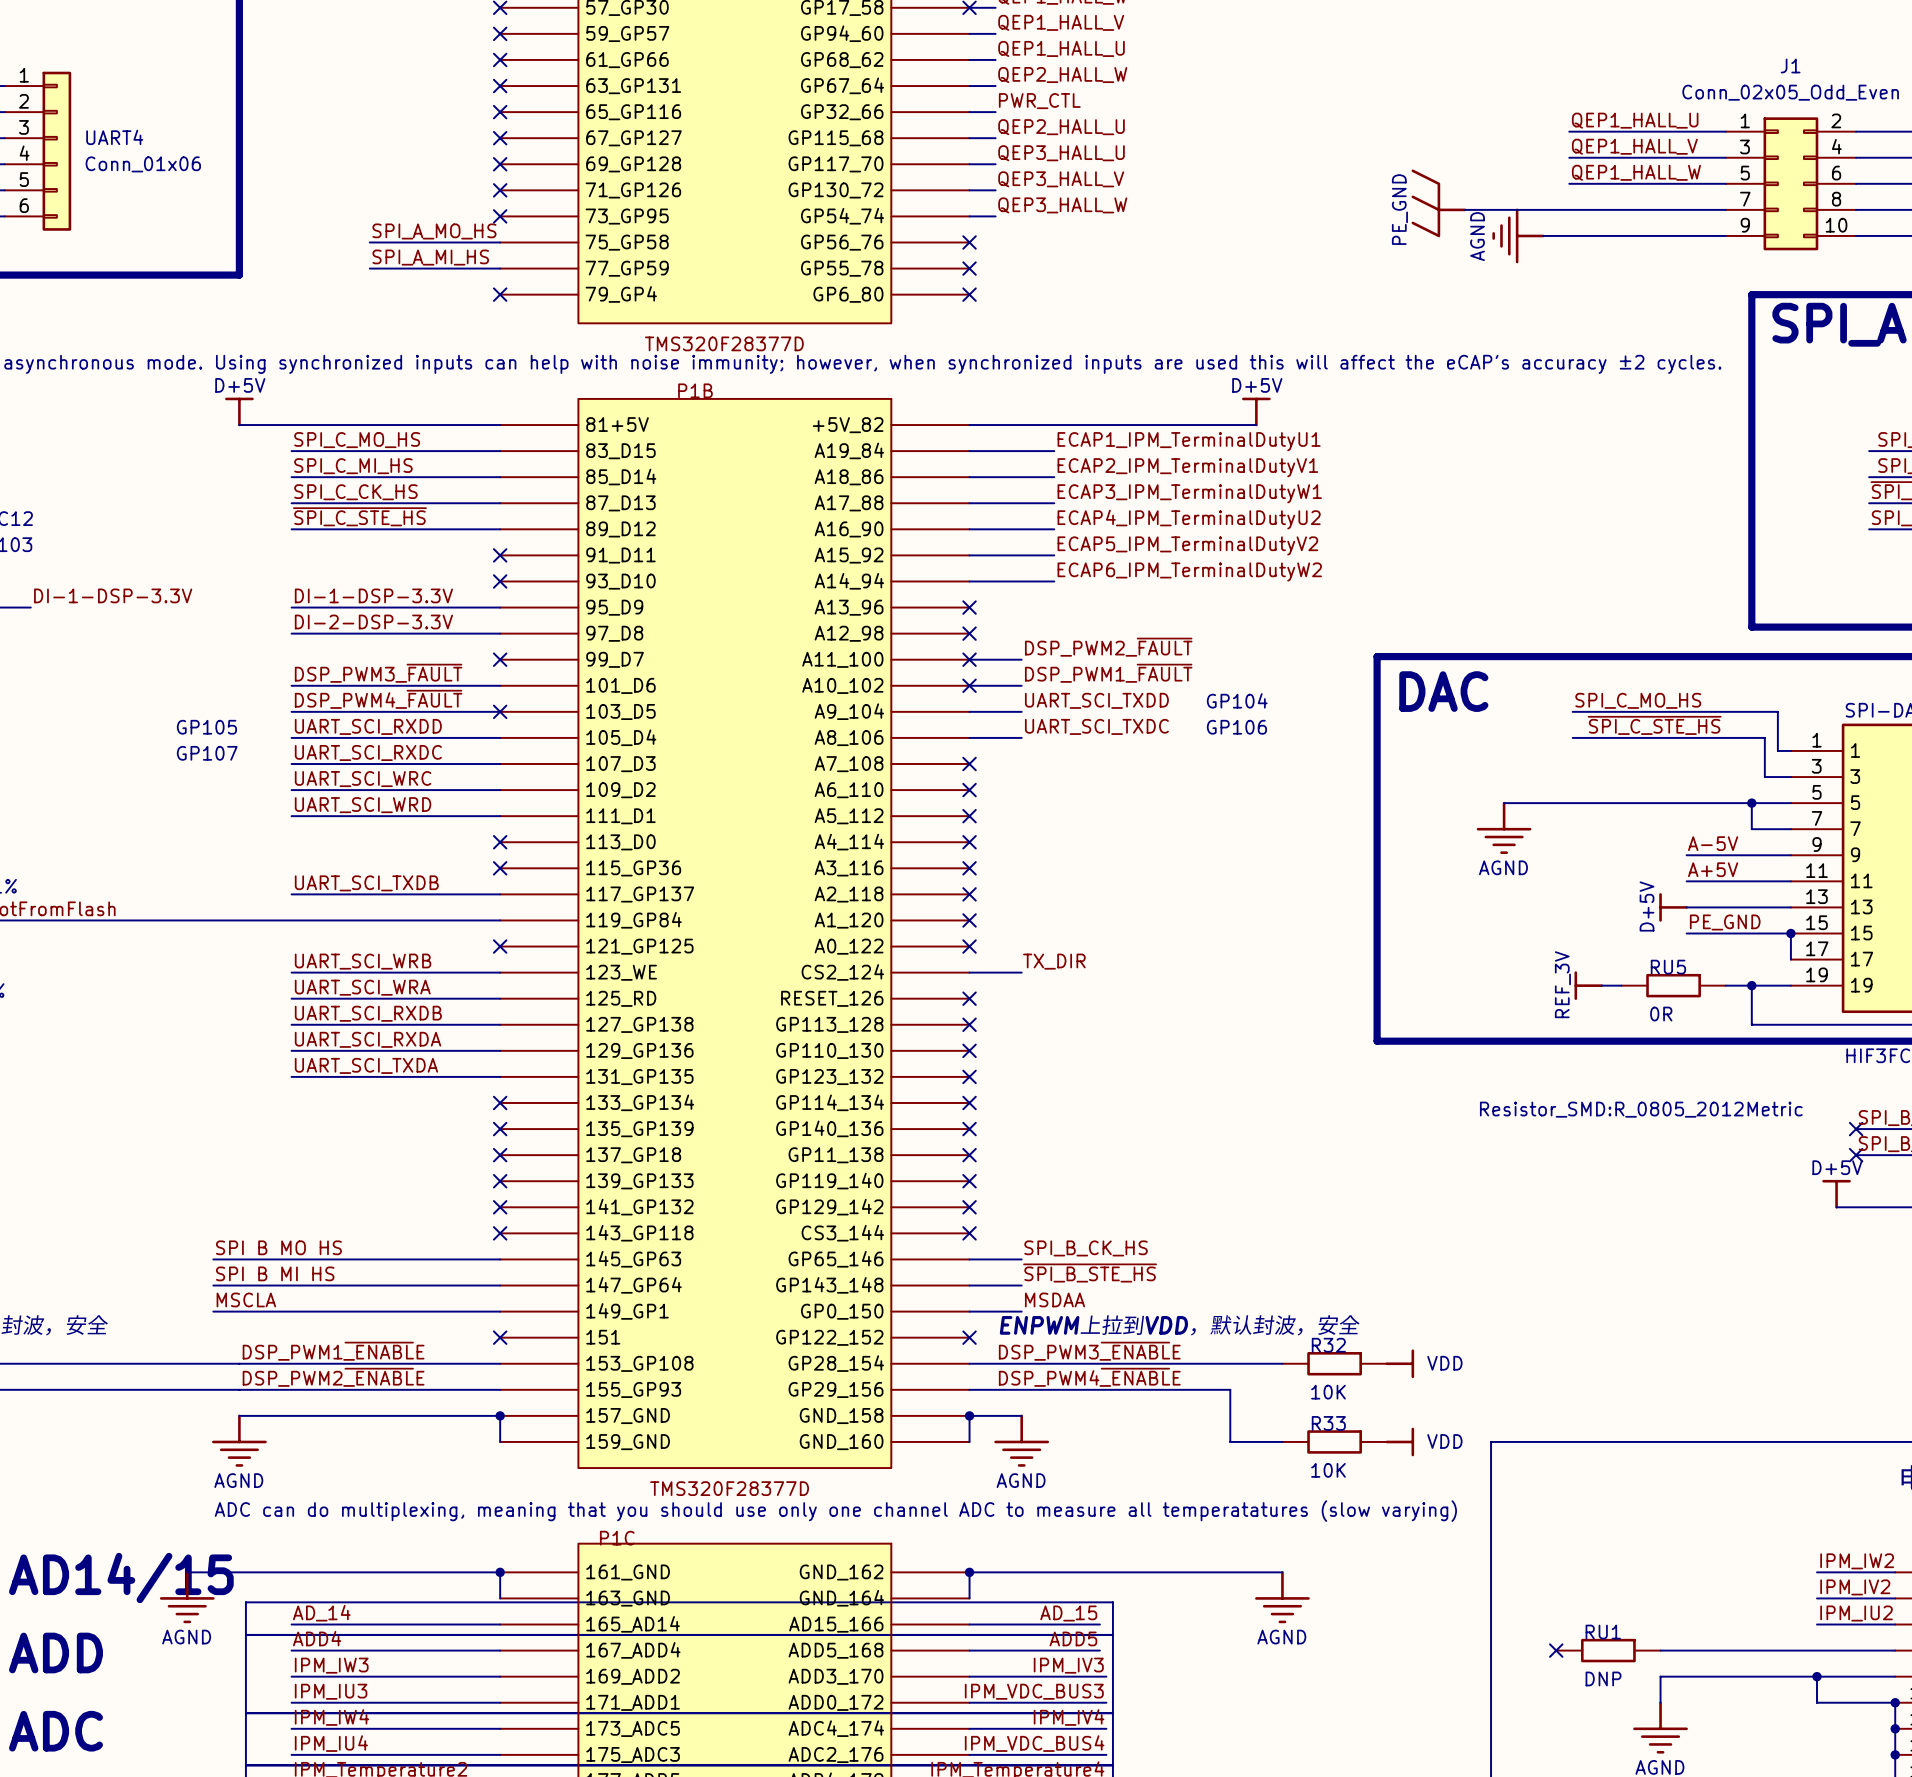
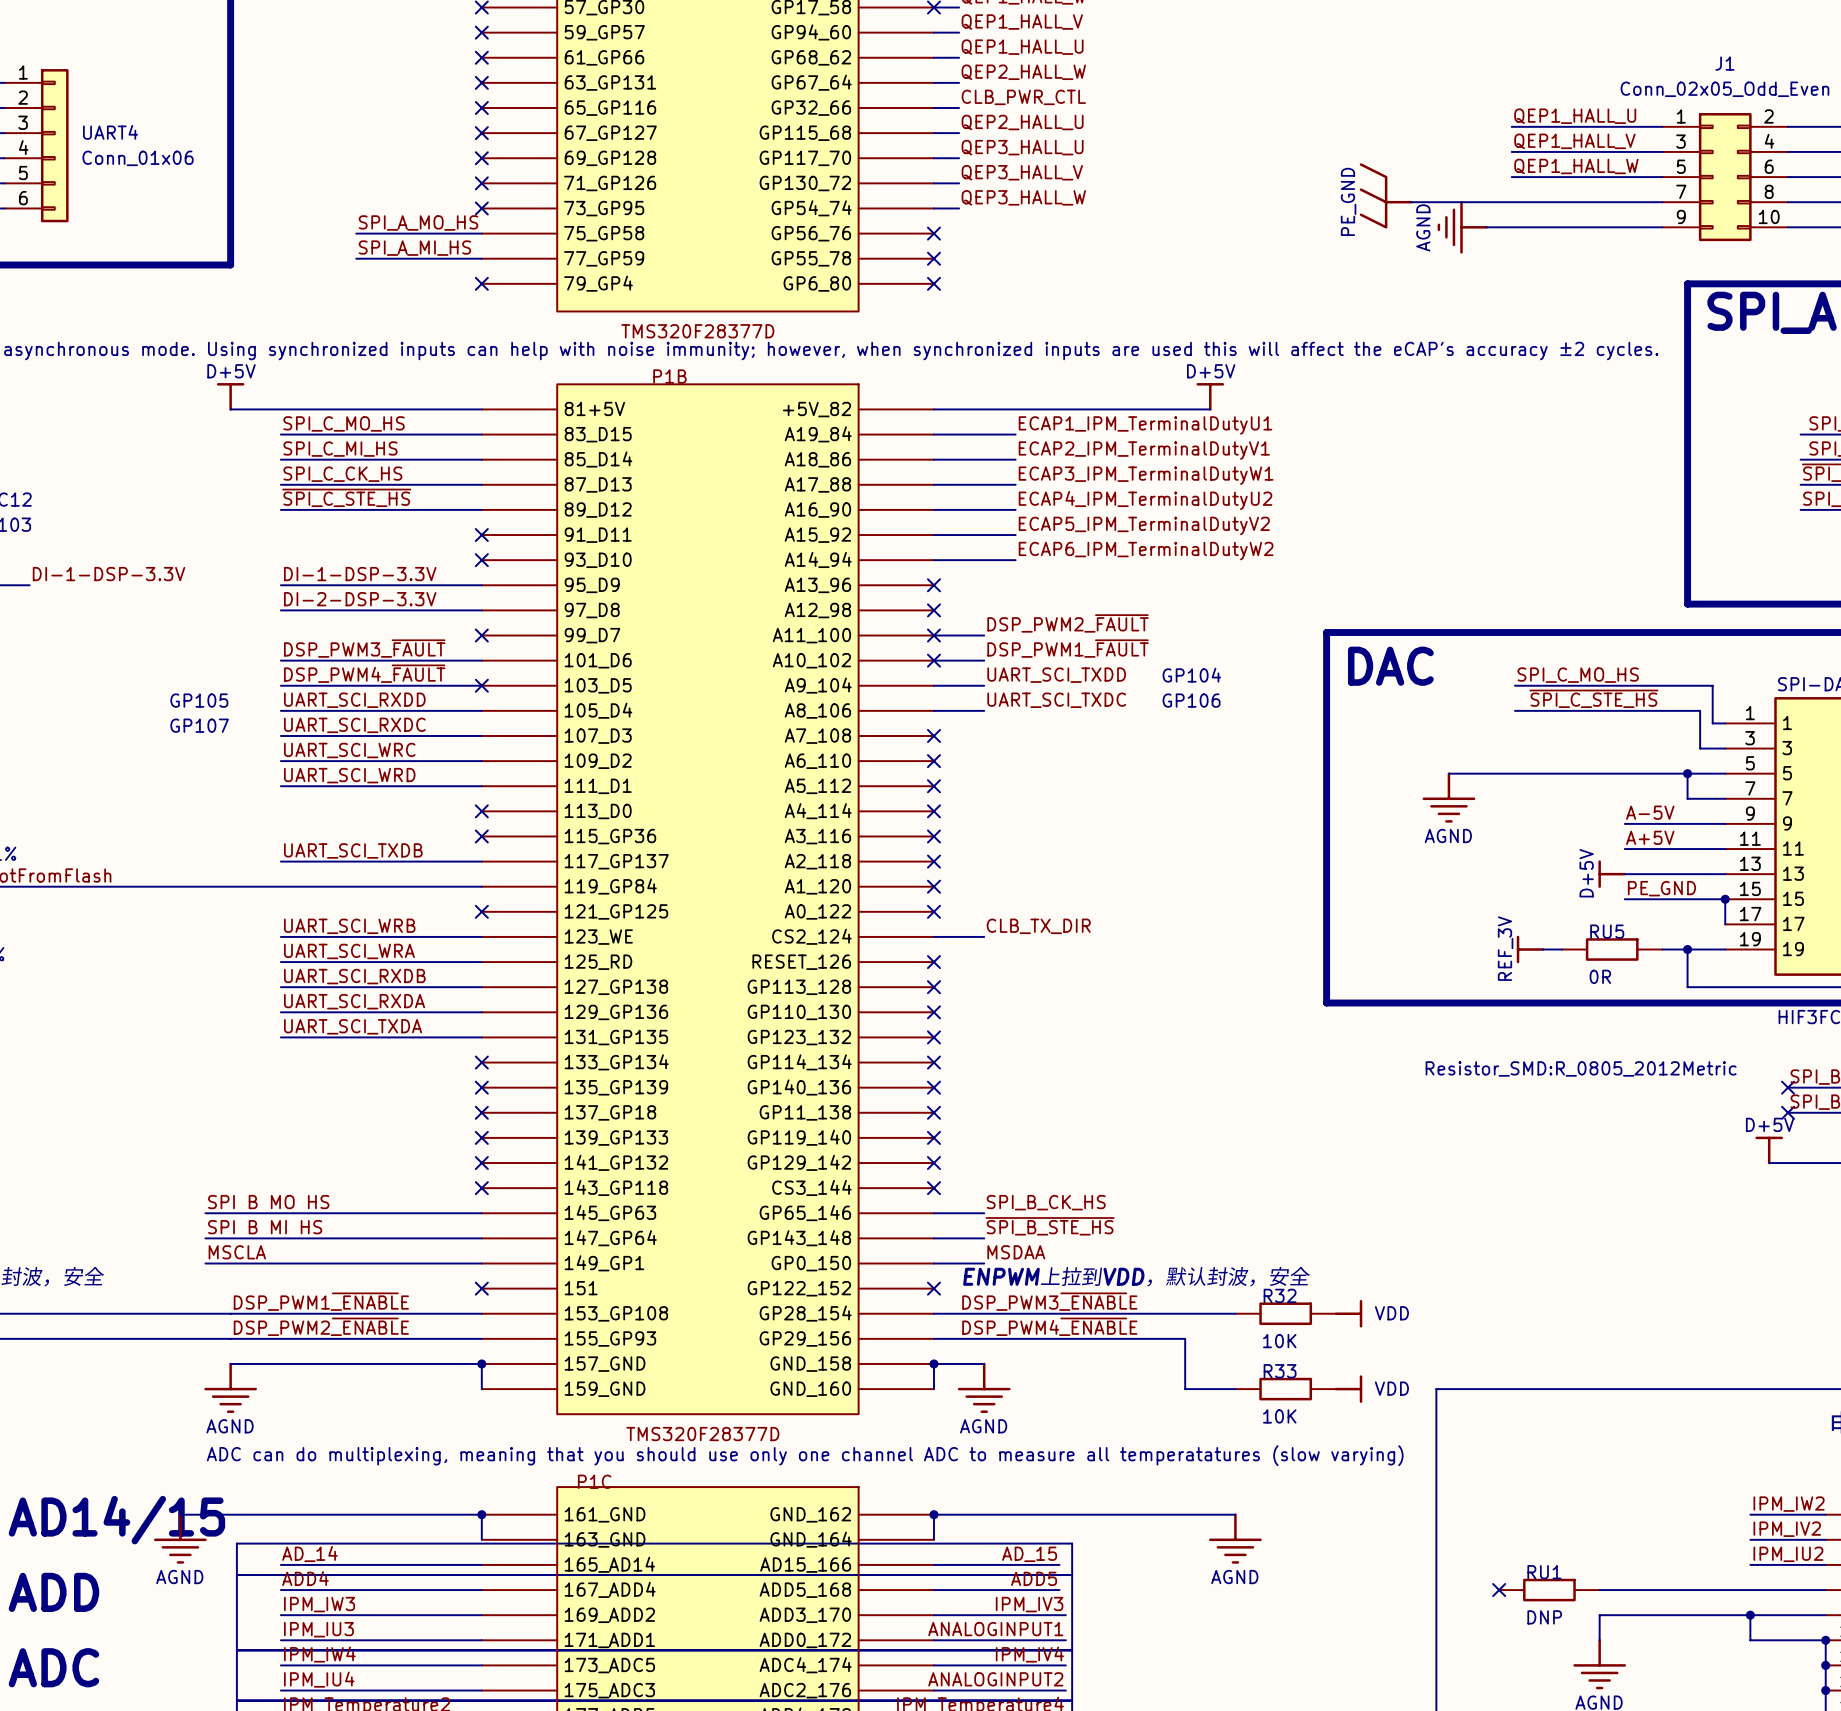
label: PWR_CTL (1039, 101) -> CLB_PWR_CTL (1023, 97)
label: TX_DIR (1054, 961) -> CLB_TX_DIR (1038, 926)
label: IPM_VDC_BUS3 (1034, 1691) -> ANALOGINPUT1 (995, 1629)
label: IPM_VDC_BUS4 (1034, 1743) -> ANALOGINPUT2 (995, 1679)

